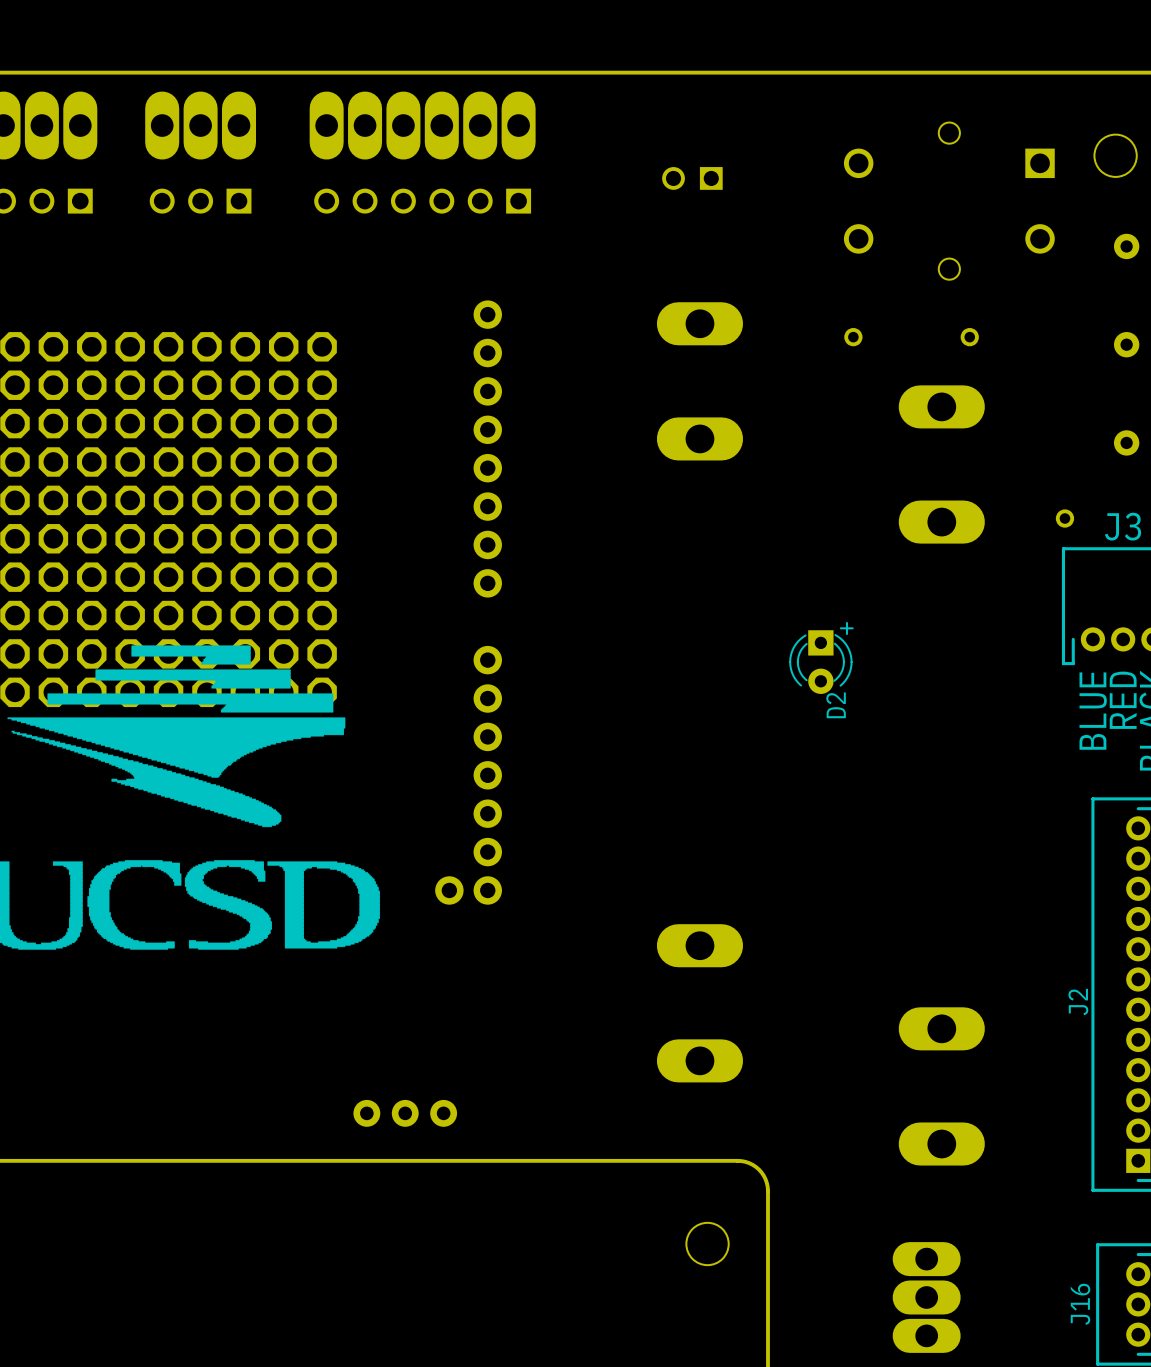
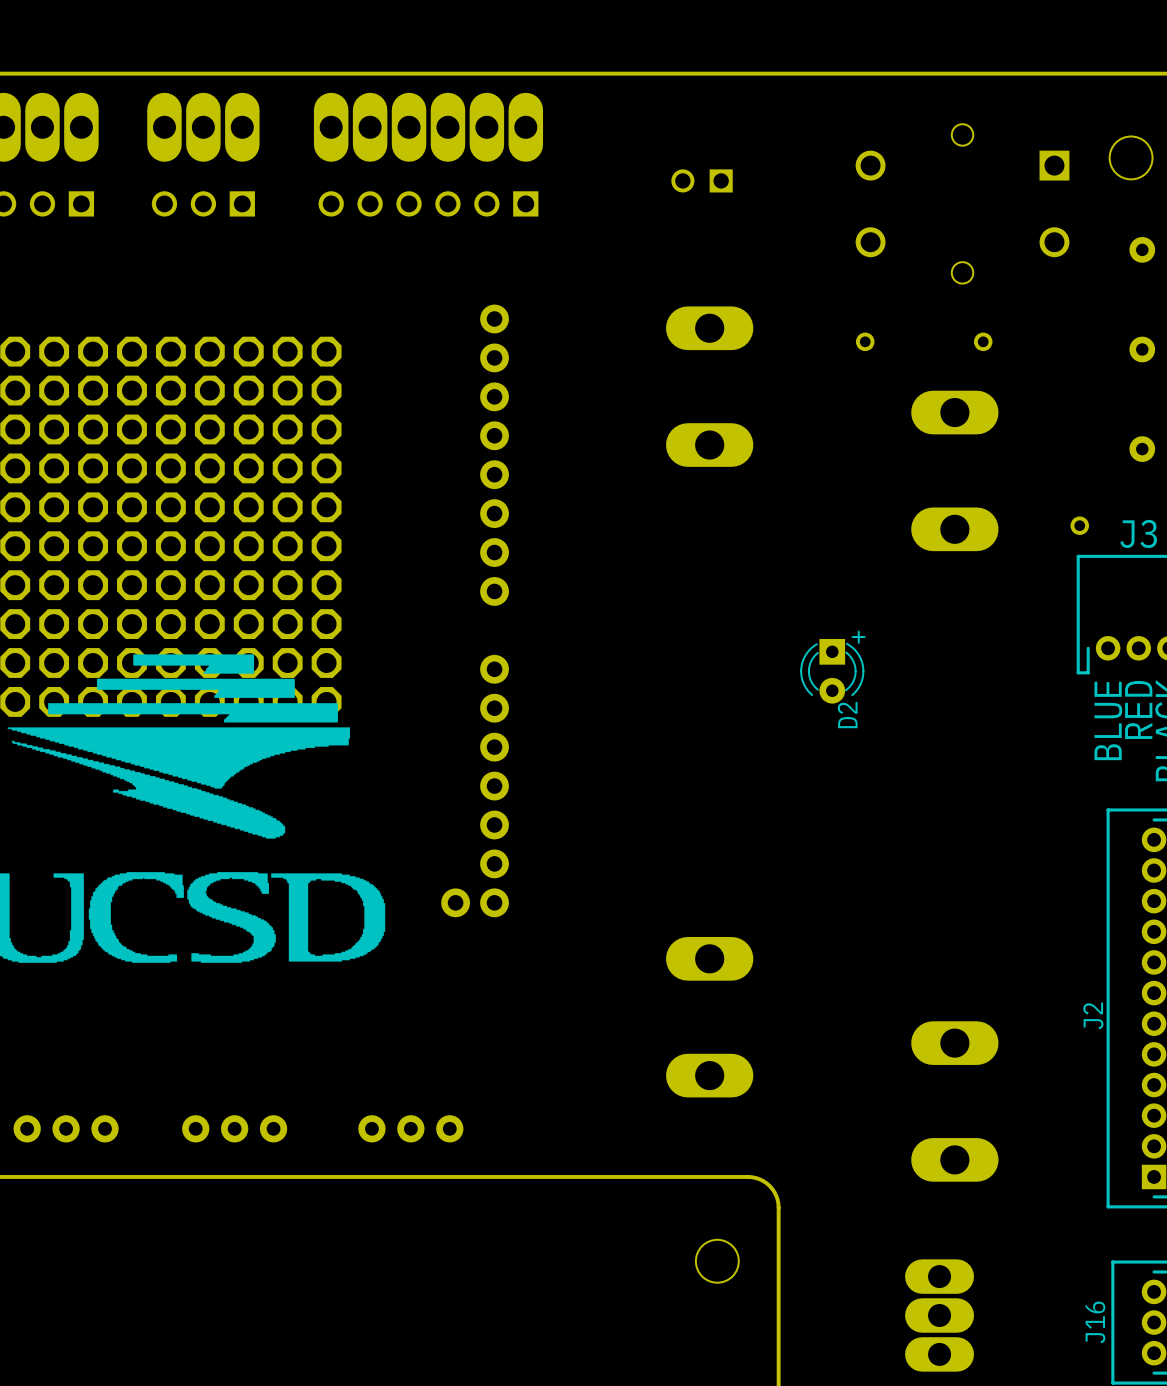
part: none -> (66, 1128)
part: none -> (234, 1128)

